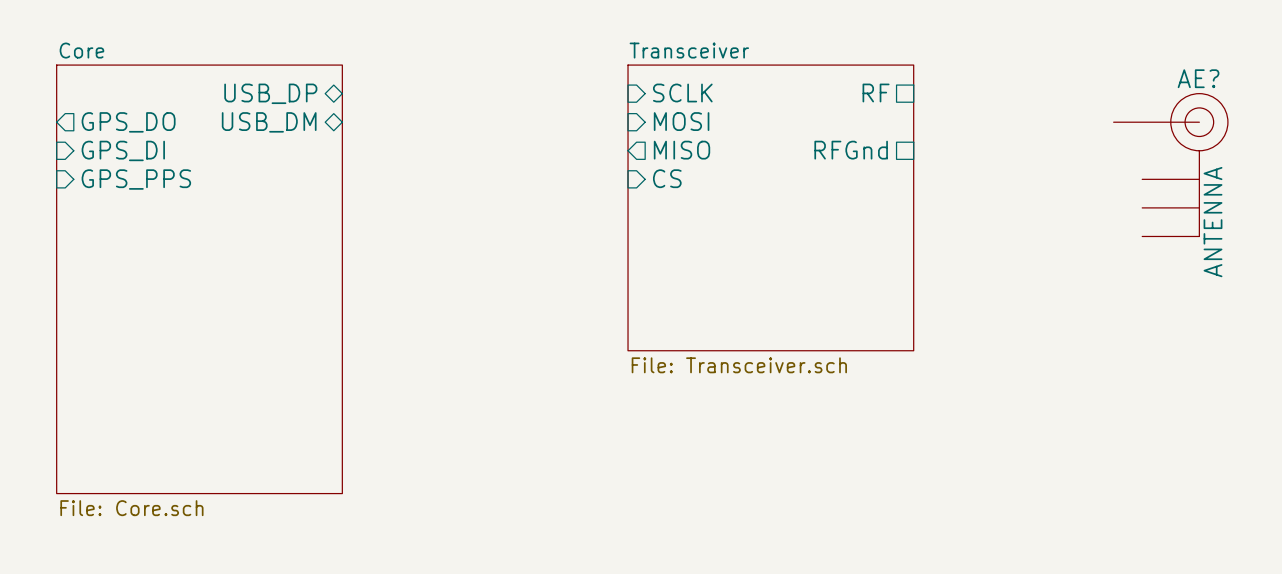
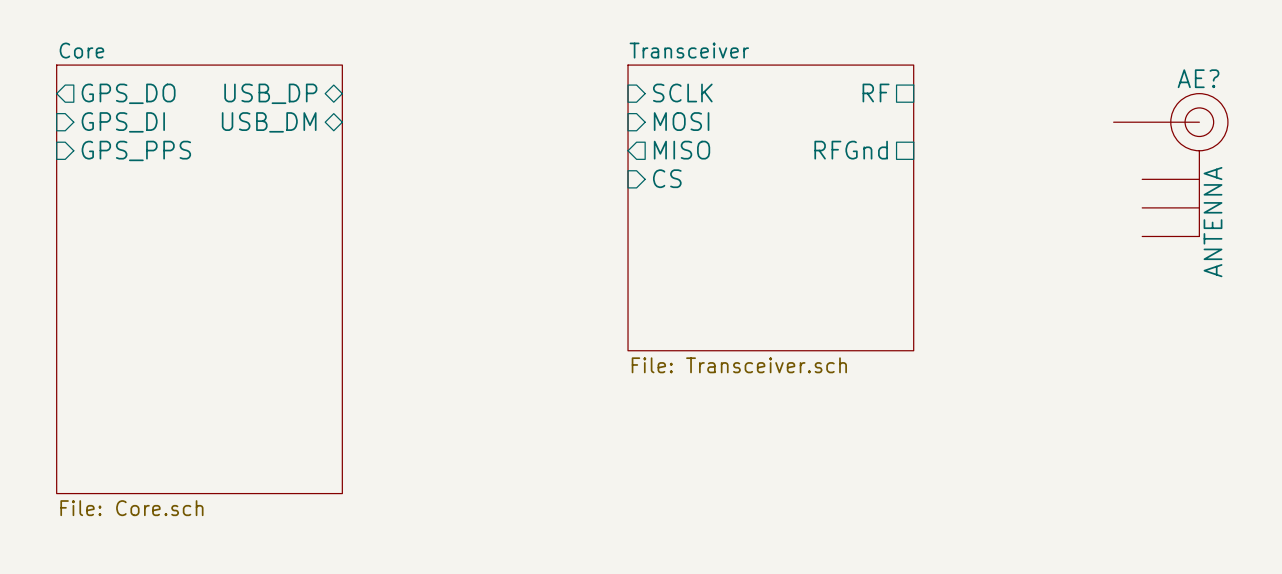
sheet pin: none -> GPS_DO (128, 93)
sheet pin shape: output (128, 122) -> input (123, 122)
sheet pin: GPS_DO (128, 122) -> GPS_DI (123, 122)
sheet pin: GPS_DI (123, 150) -> GPS_PPS (136, 150)
sheet pin: GPS_PPS (136, 179) -> none

